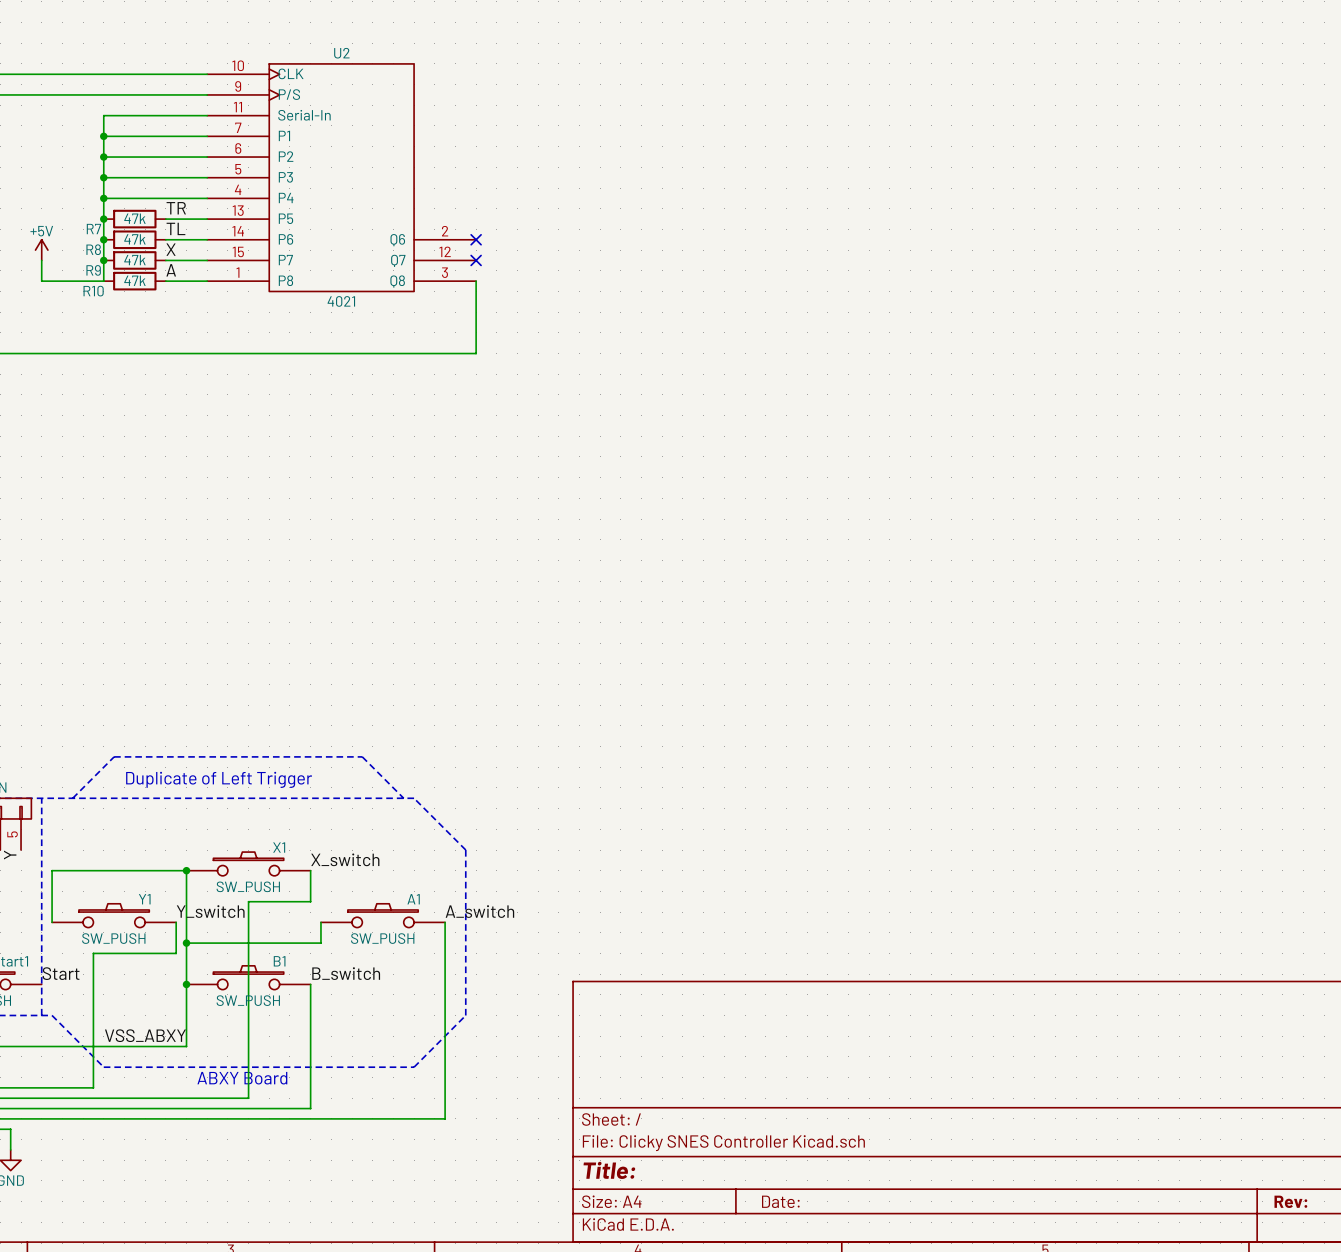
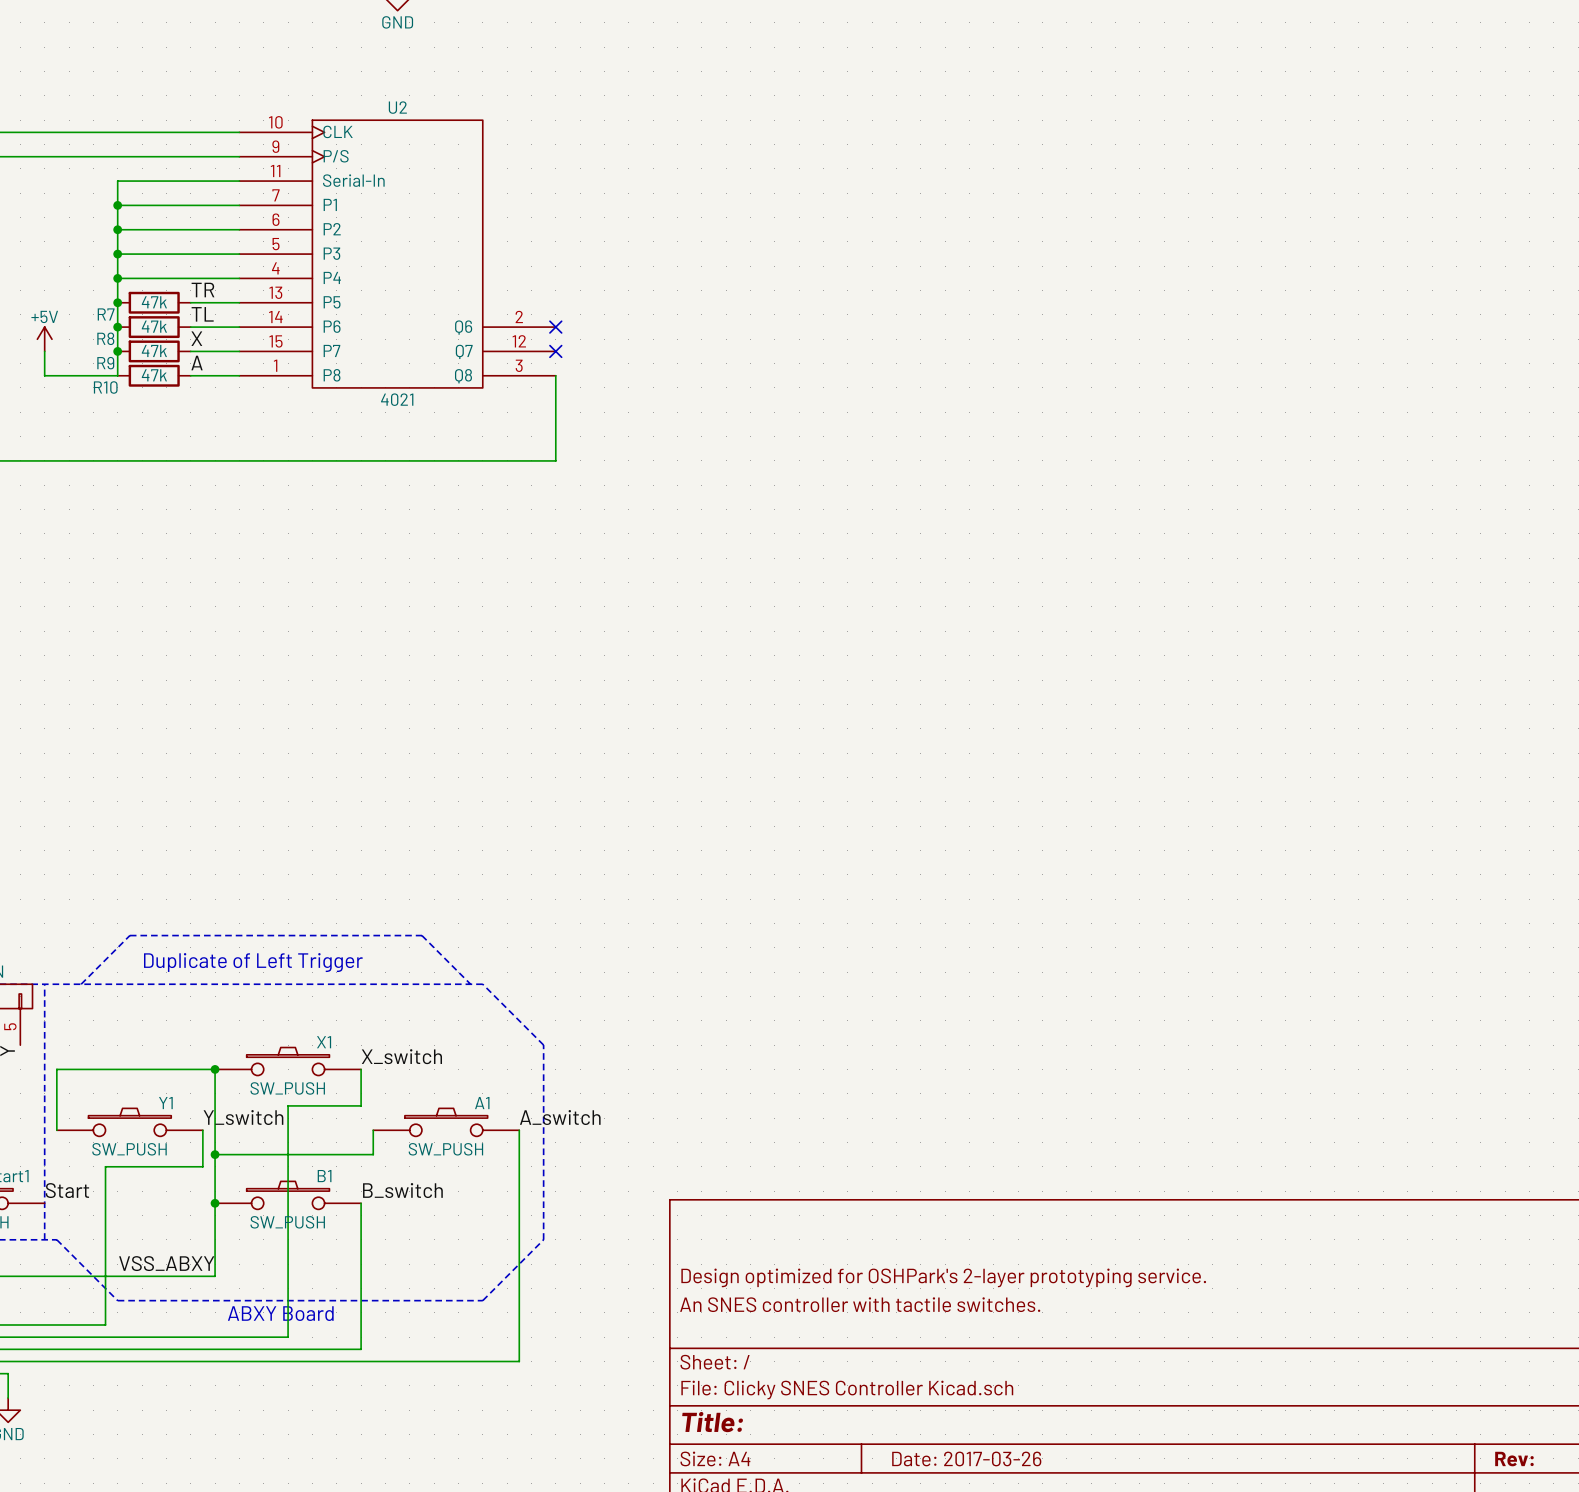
title block: none -> Design optimized for OSHPark's 2-layer prototyping service. (943, 1277)
title block: none -> An SNES controller with tactile switches. (860, 1304)
title block: Date: (780, 1201) -> Date: 2017-03-26 (966, 1458)

